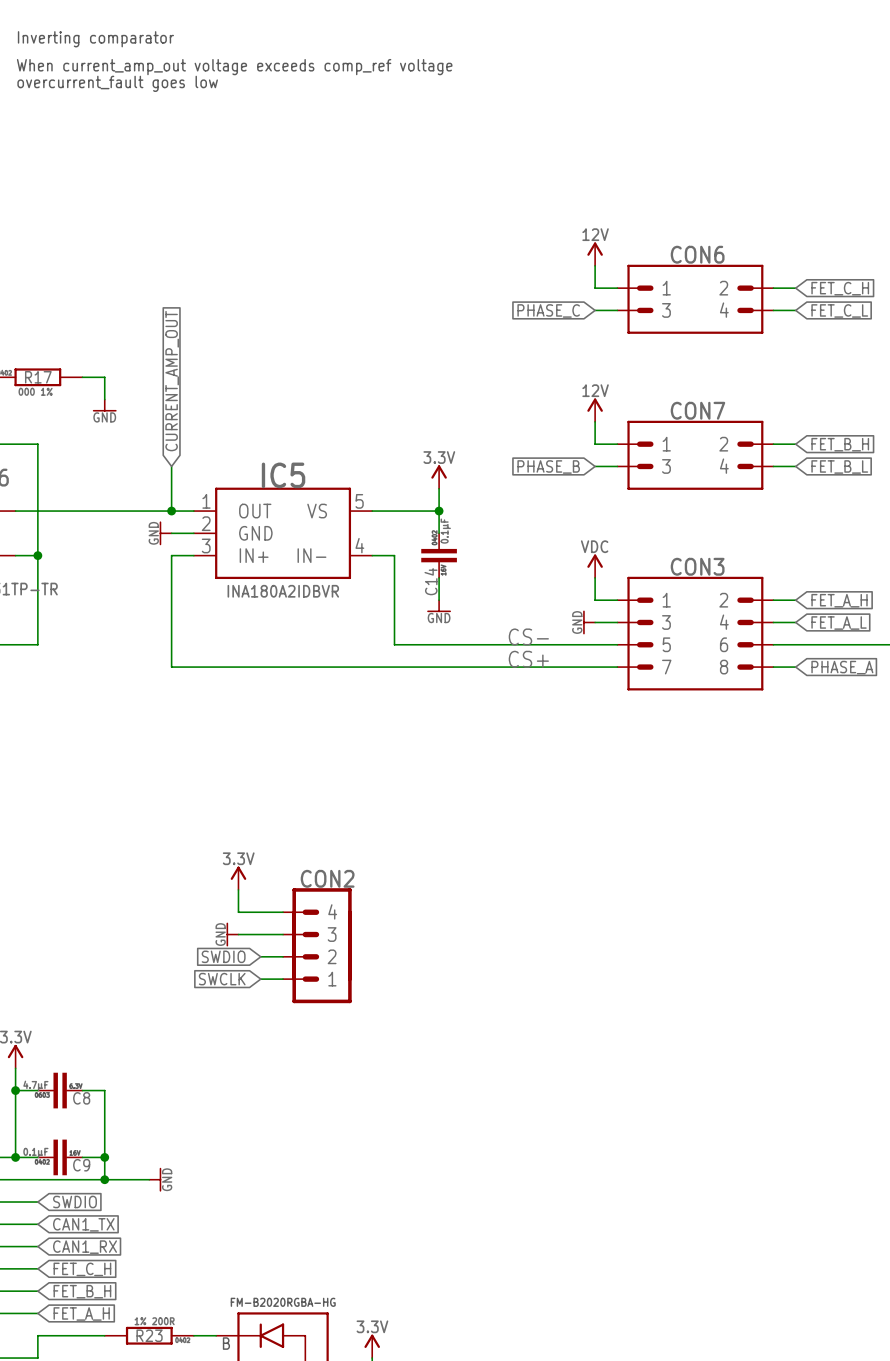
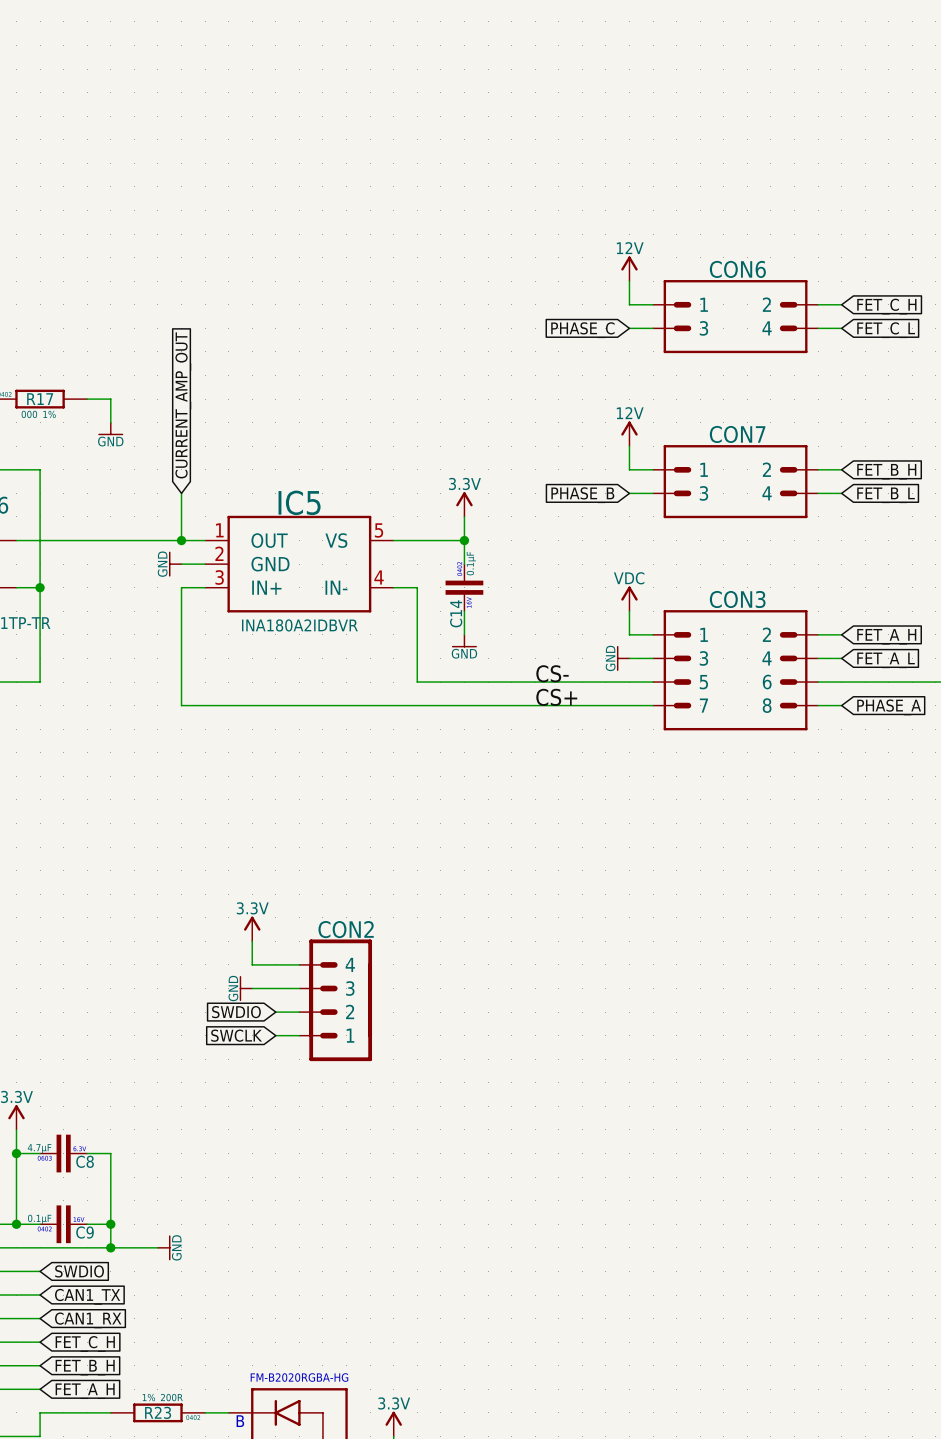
text: Inverting comparator (95, 39) -> none
text: When current_amp_out voltage exceeds comp_ref voltage (234, 67) -> none
text: overcurrent_fault goes low (117, 83) -> none

